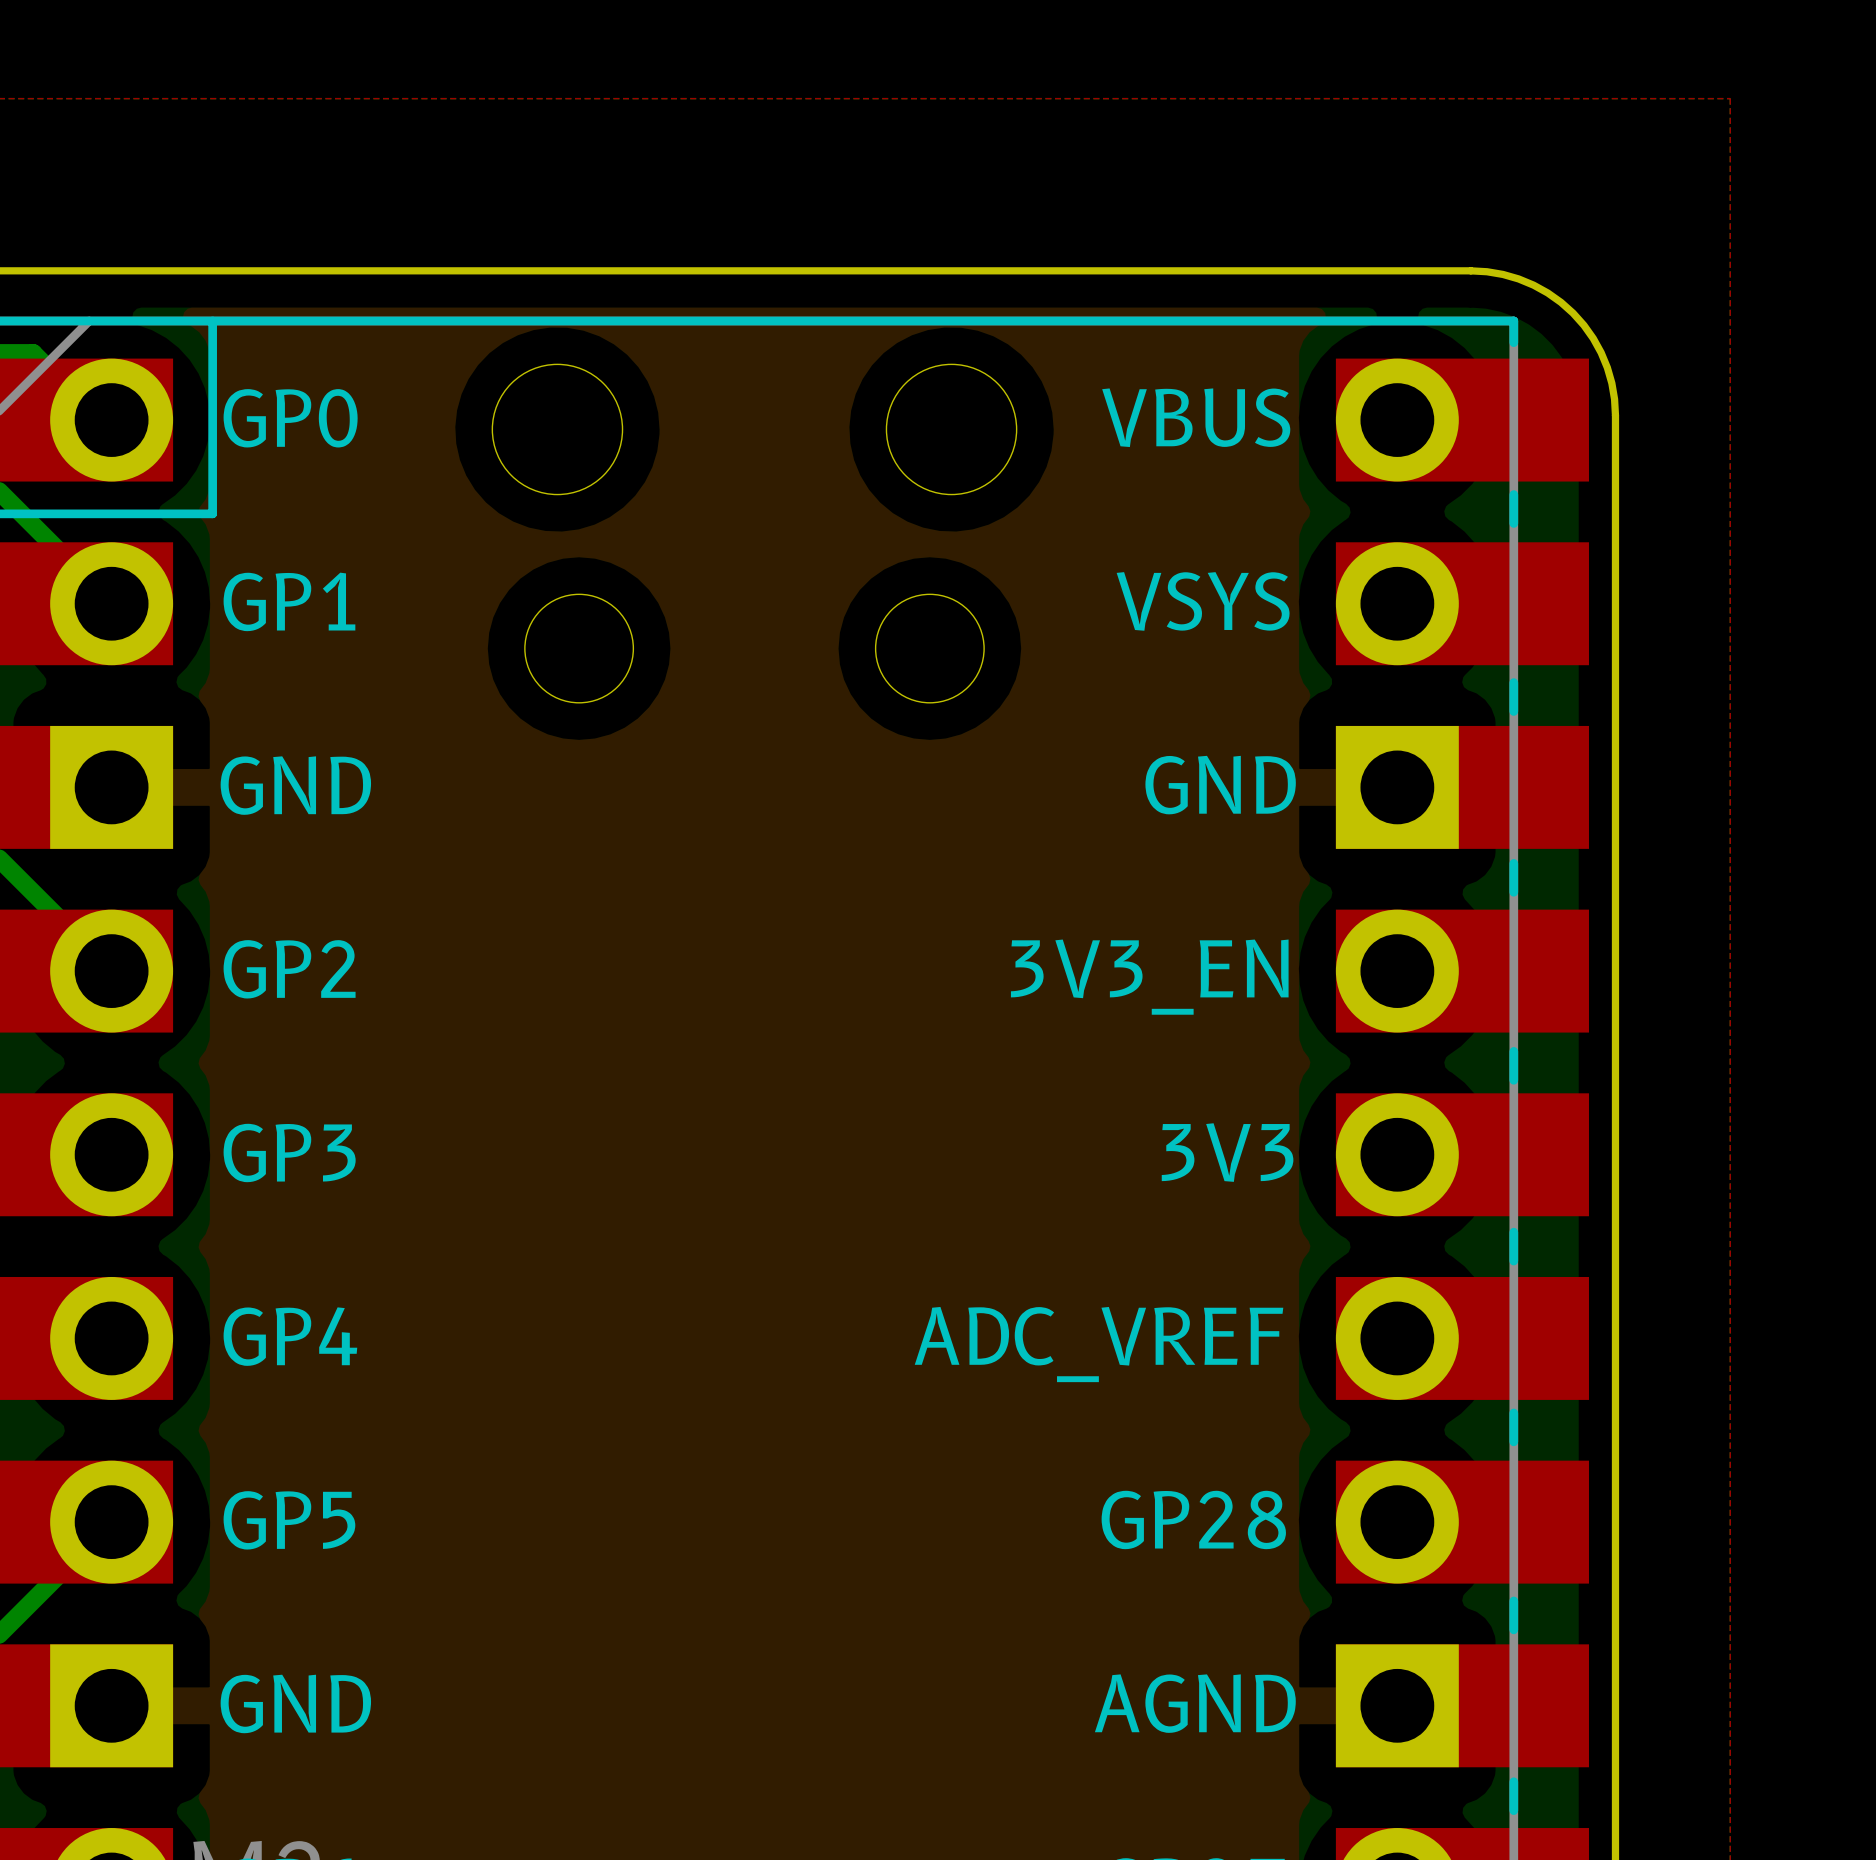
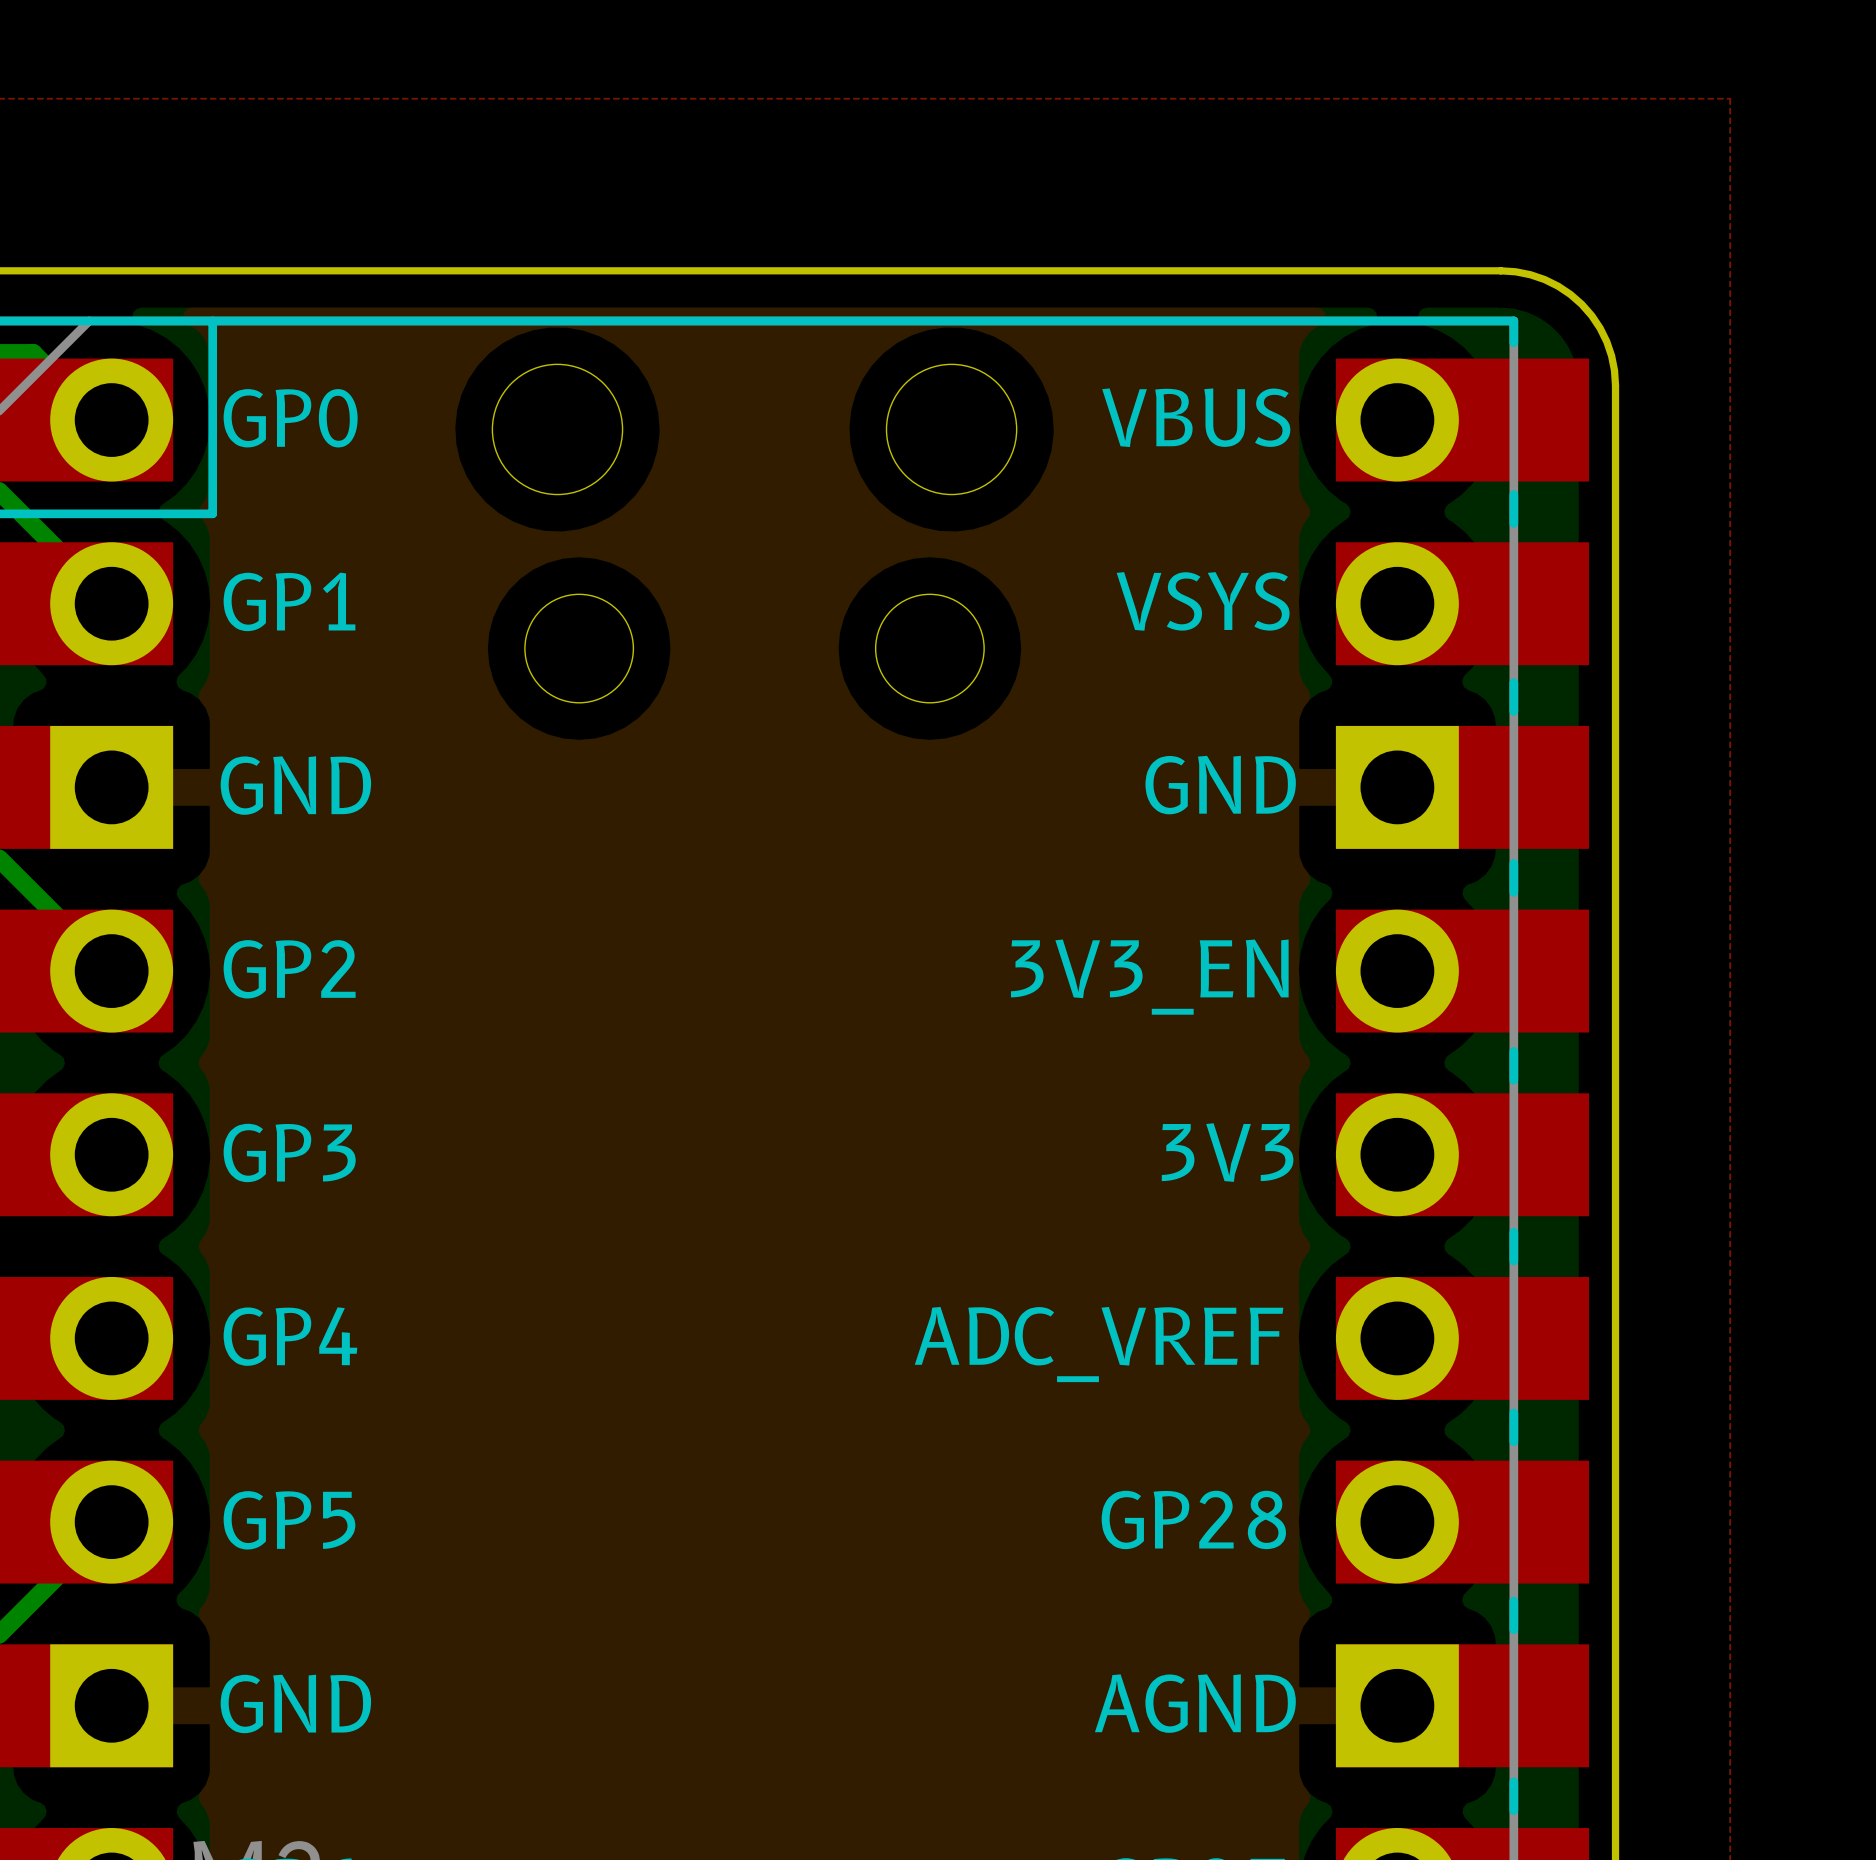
board edge: (1470, 270) (1503, 274) (1518, 278) (1547, 293) (1573, 313) (1593, 338) (1607, 367) (1611, 383) (1615, 415) -> (1470, 270) (1500, 270) (1530, 274) (1558, 286) (1581, 304) (1600, 328) (1611, 355) (1615, 385) (1615, 415)

